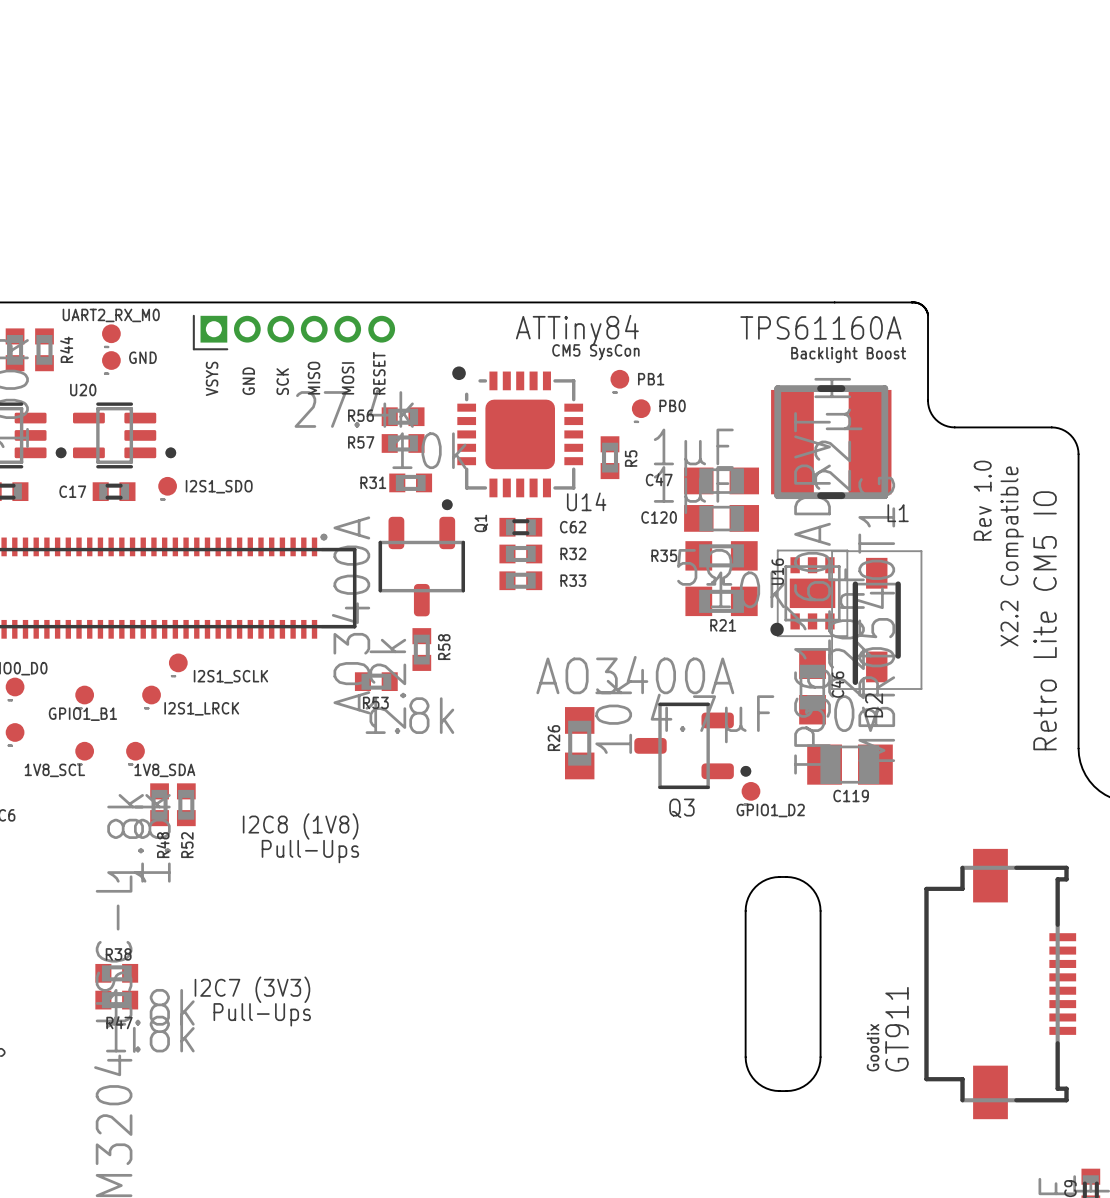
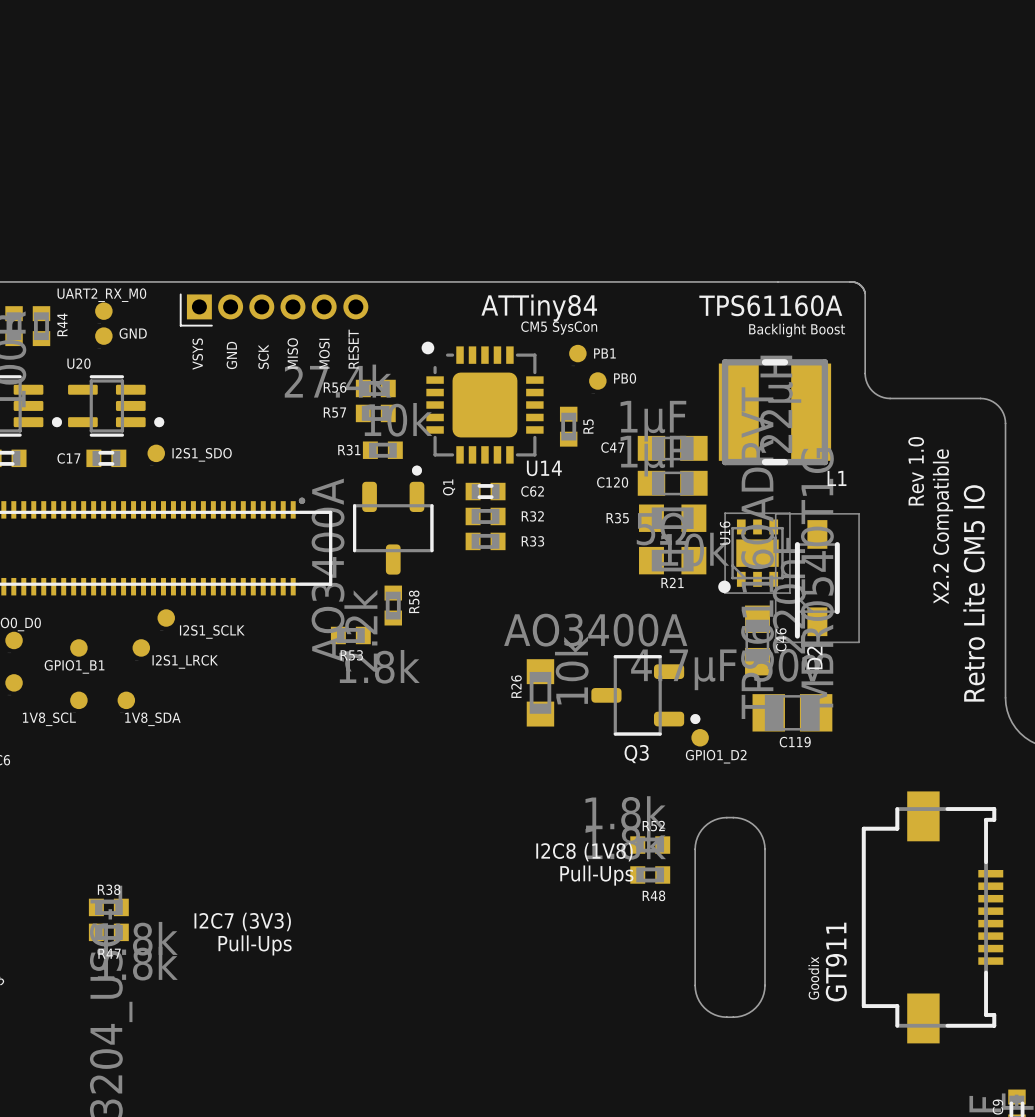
R48 rotation: 0° (159, 804) -> 90° clockwise (650, 874)
R48 position: (159, 804) -> (650, 874)
R52 rotation: 0° (186, 804) -> 90° clockwise (650, 845)
R52 position: (186, 804) -> (650, 845)
text position: I2C8 (1V8) (300, 826) -> I2C8 (1V8) (584, 852)
text position: Pull-Ups (310, 851) -> Pull-Ups (596, 875)

